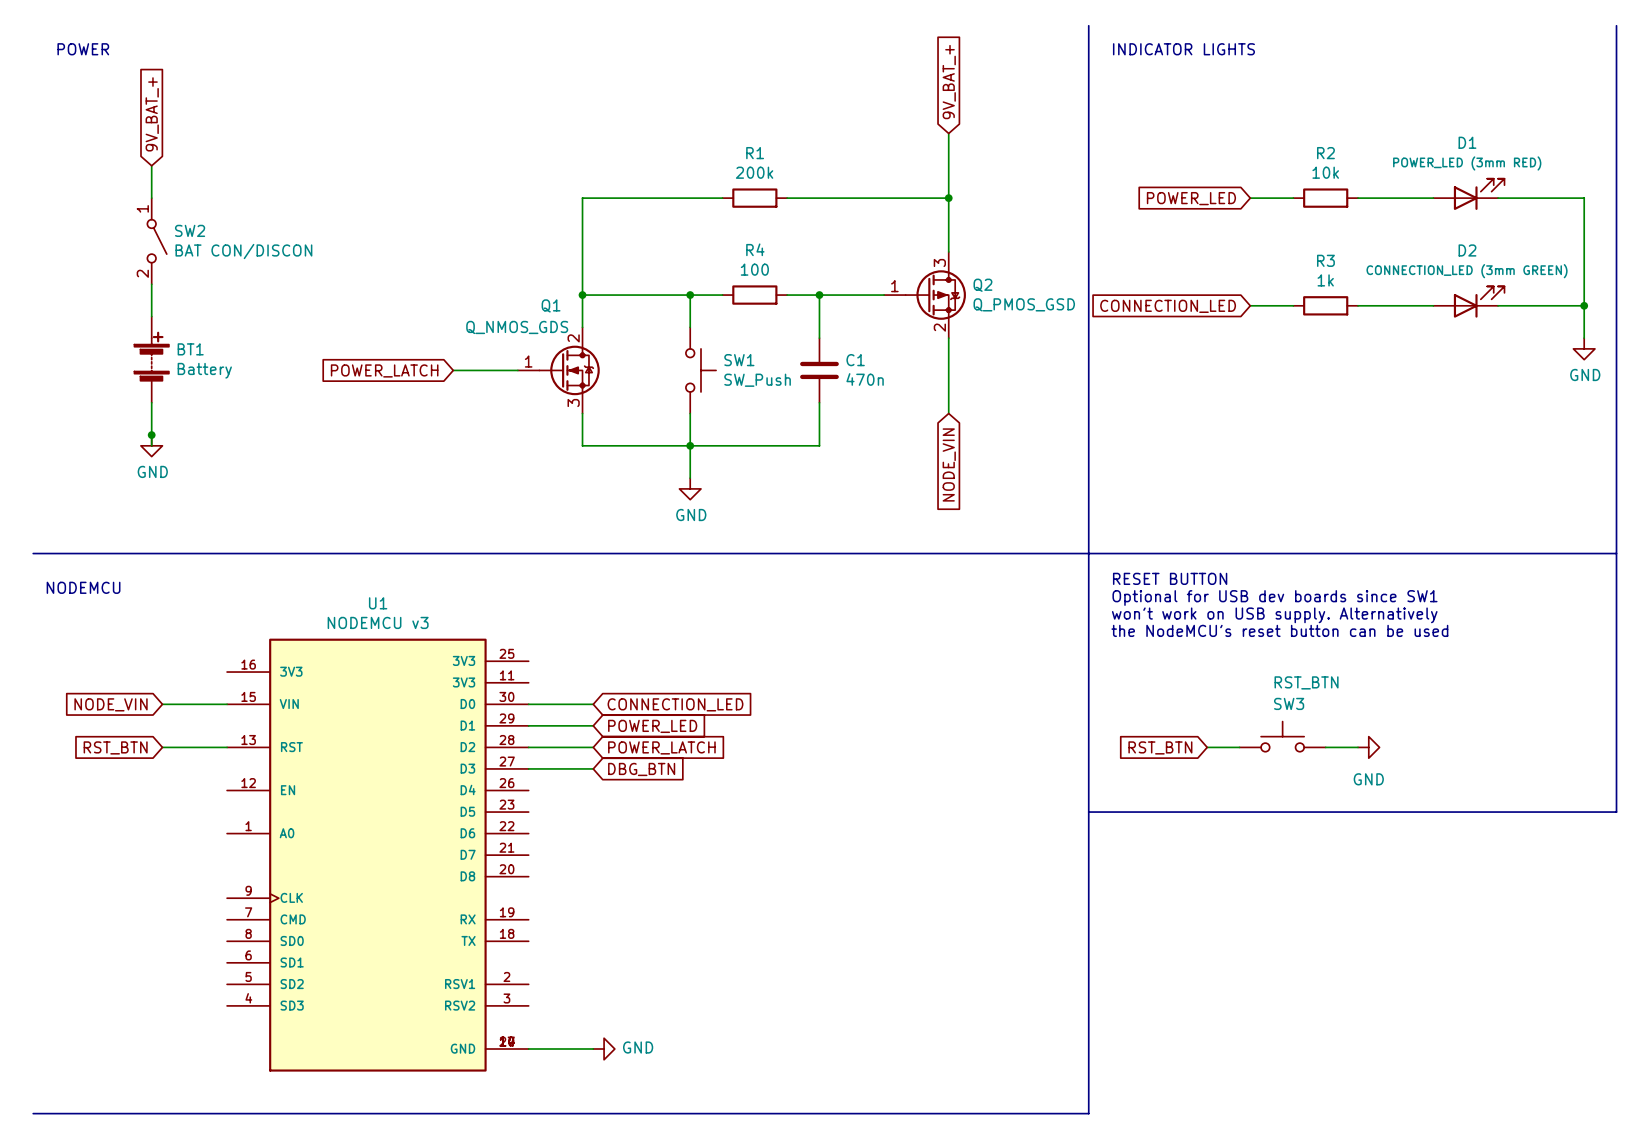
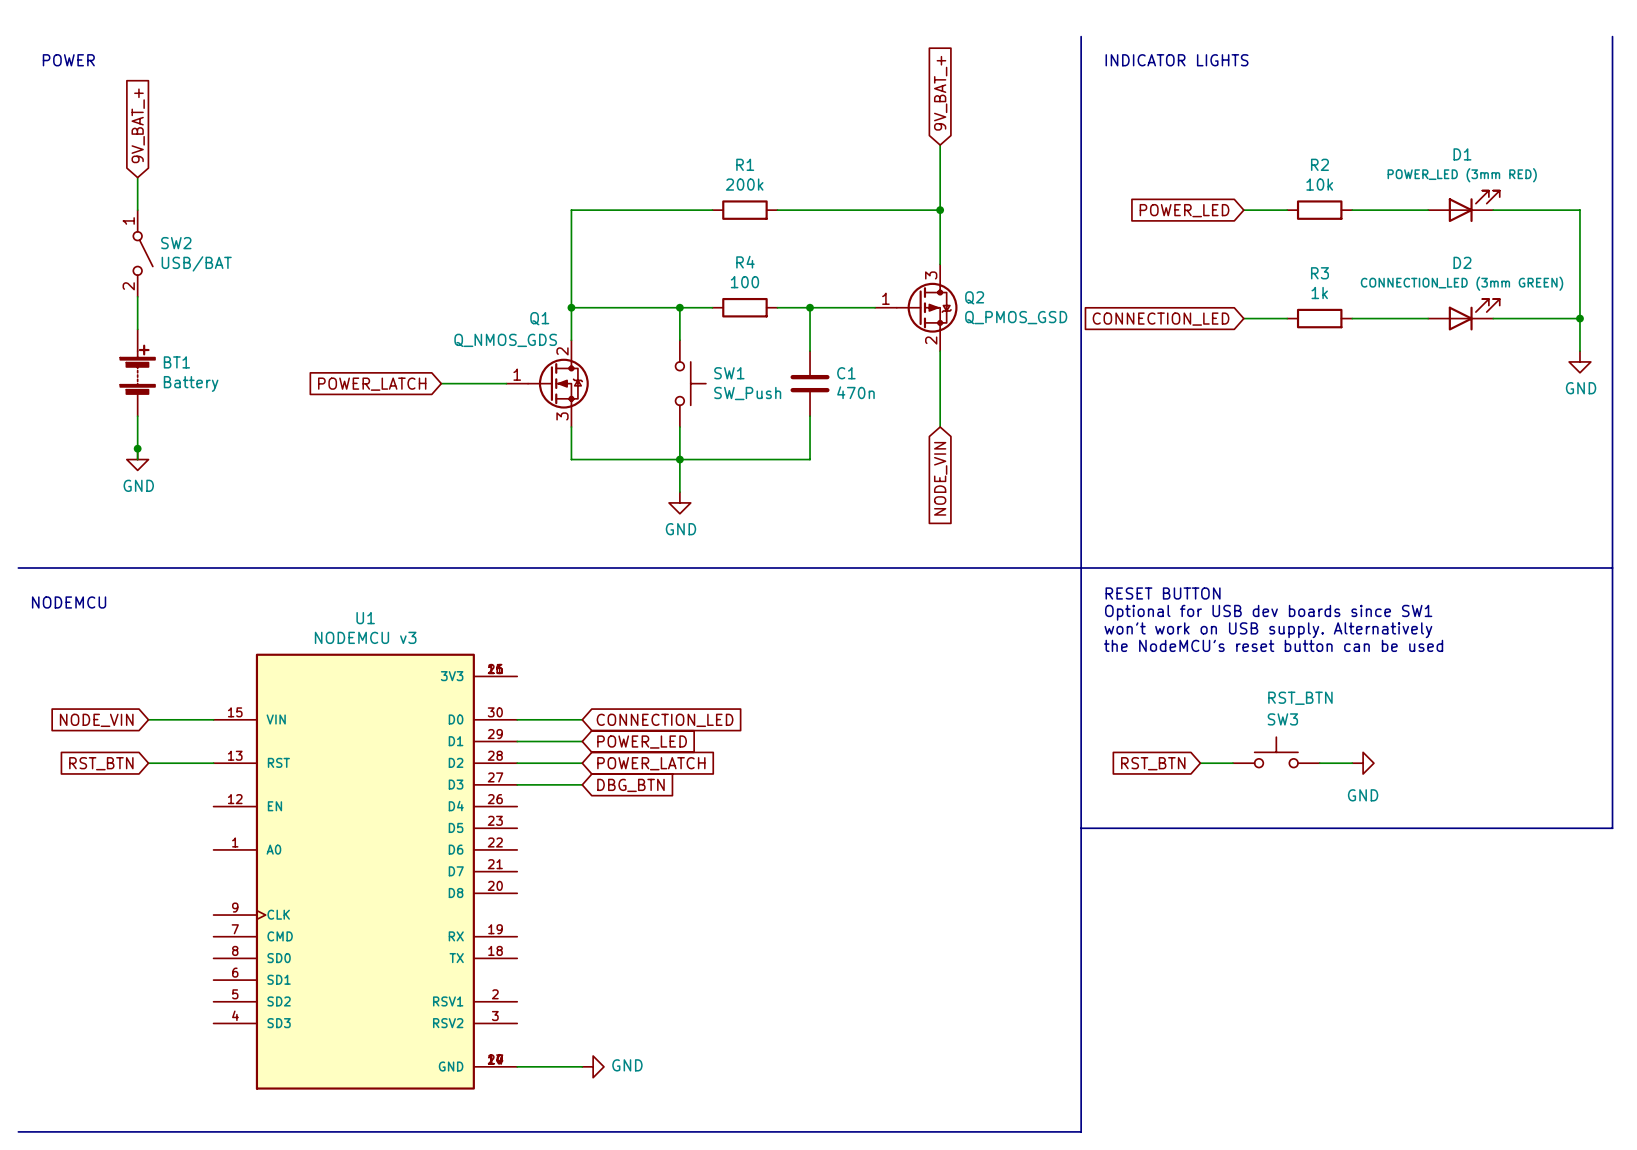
SW2 value: BAT CON/DISCON (243, 251) -> USB/BAT (196, 263)
U1 symbol: [227, 638, 529, 1072] -> [213, 653, 518, 1090]

